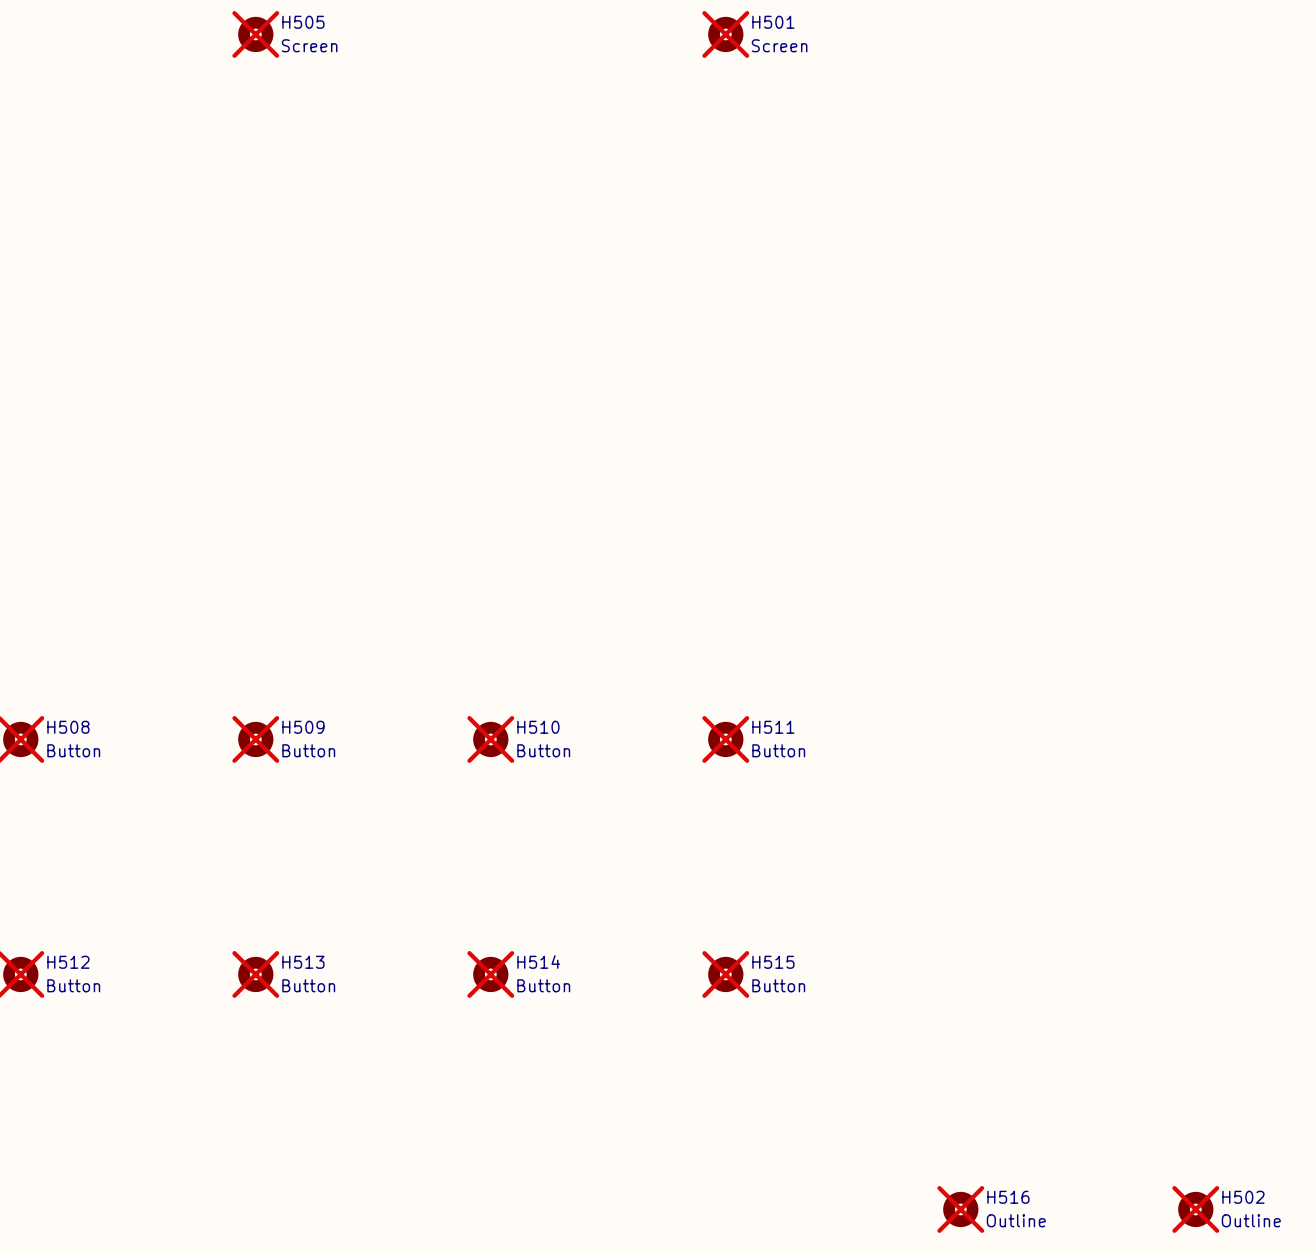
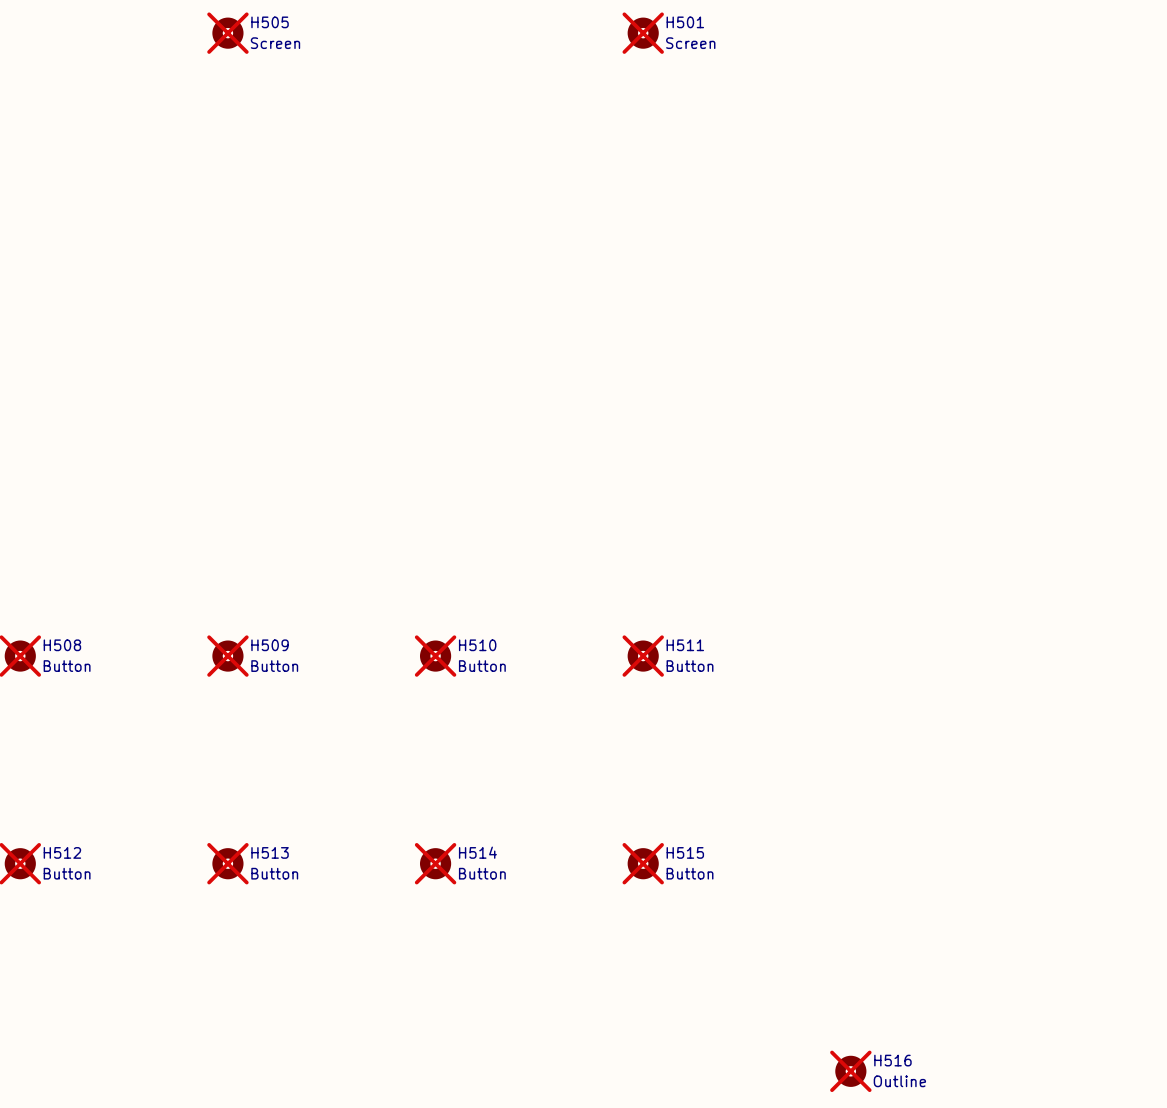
H502: Outline (1195, 1209) -> none

